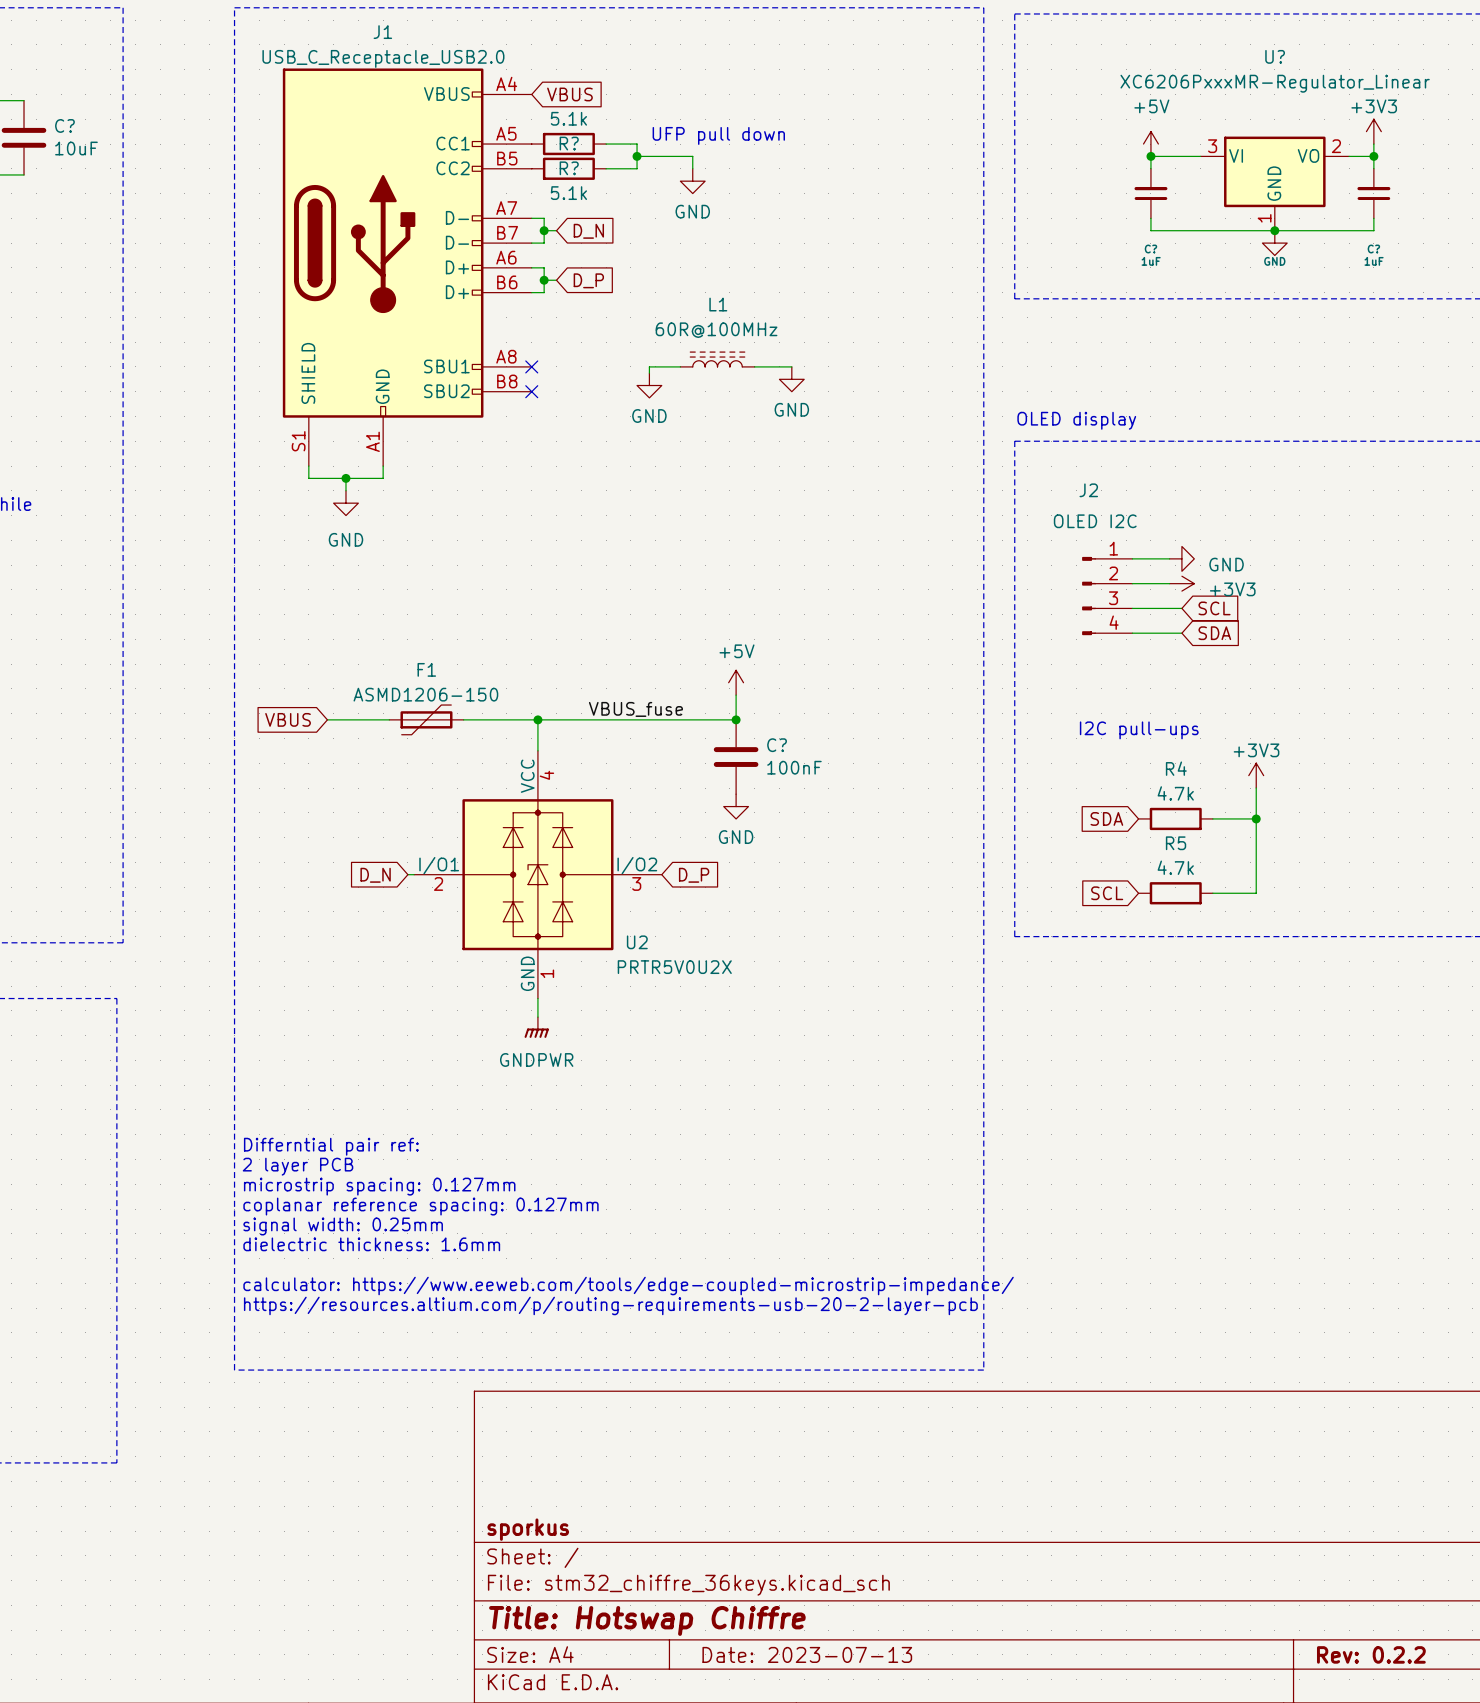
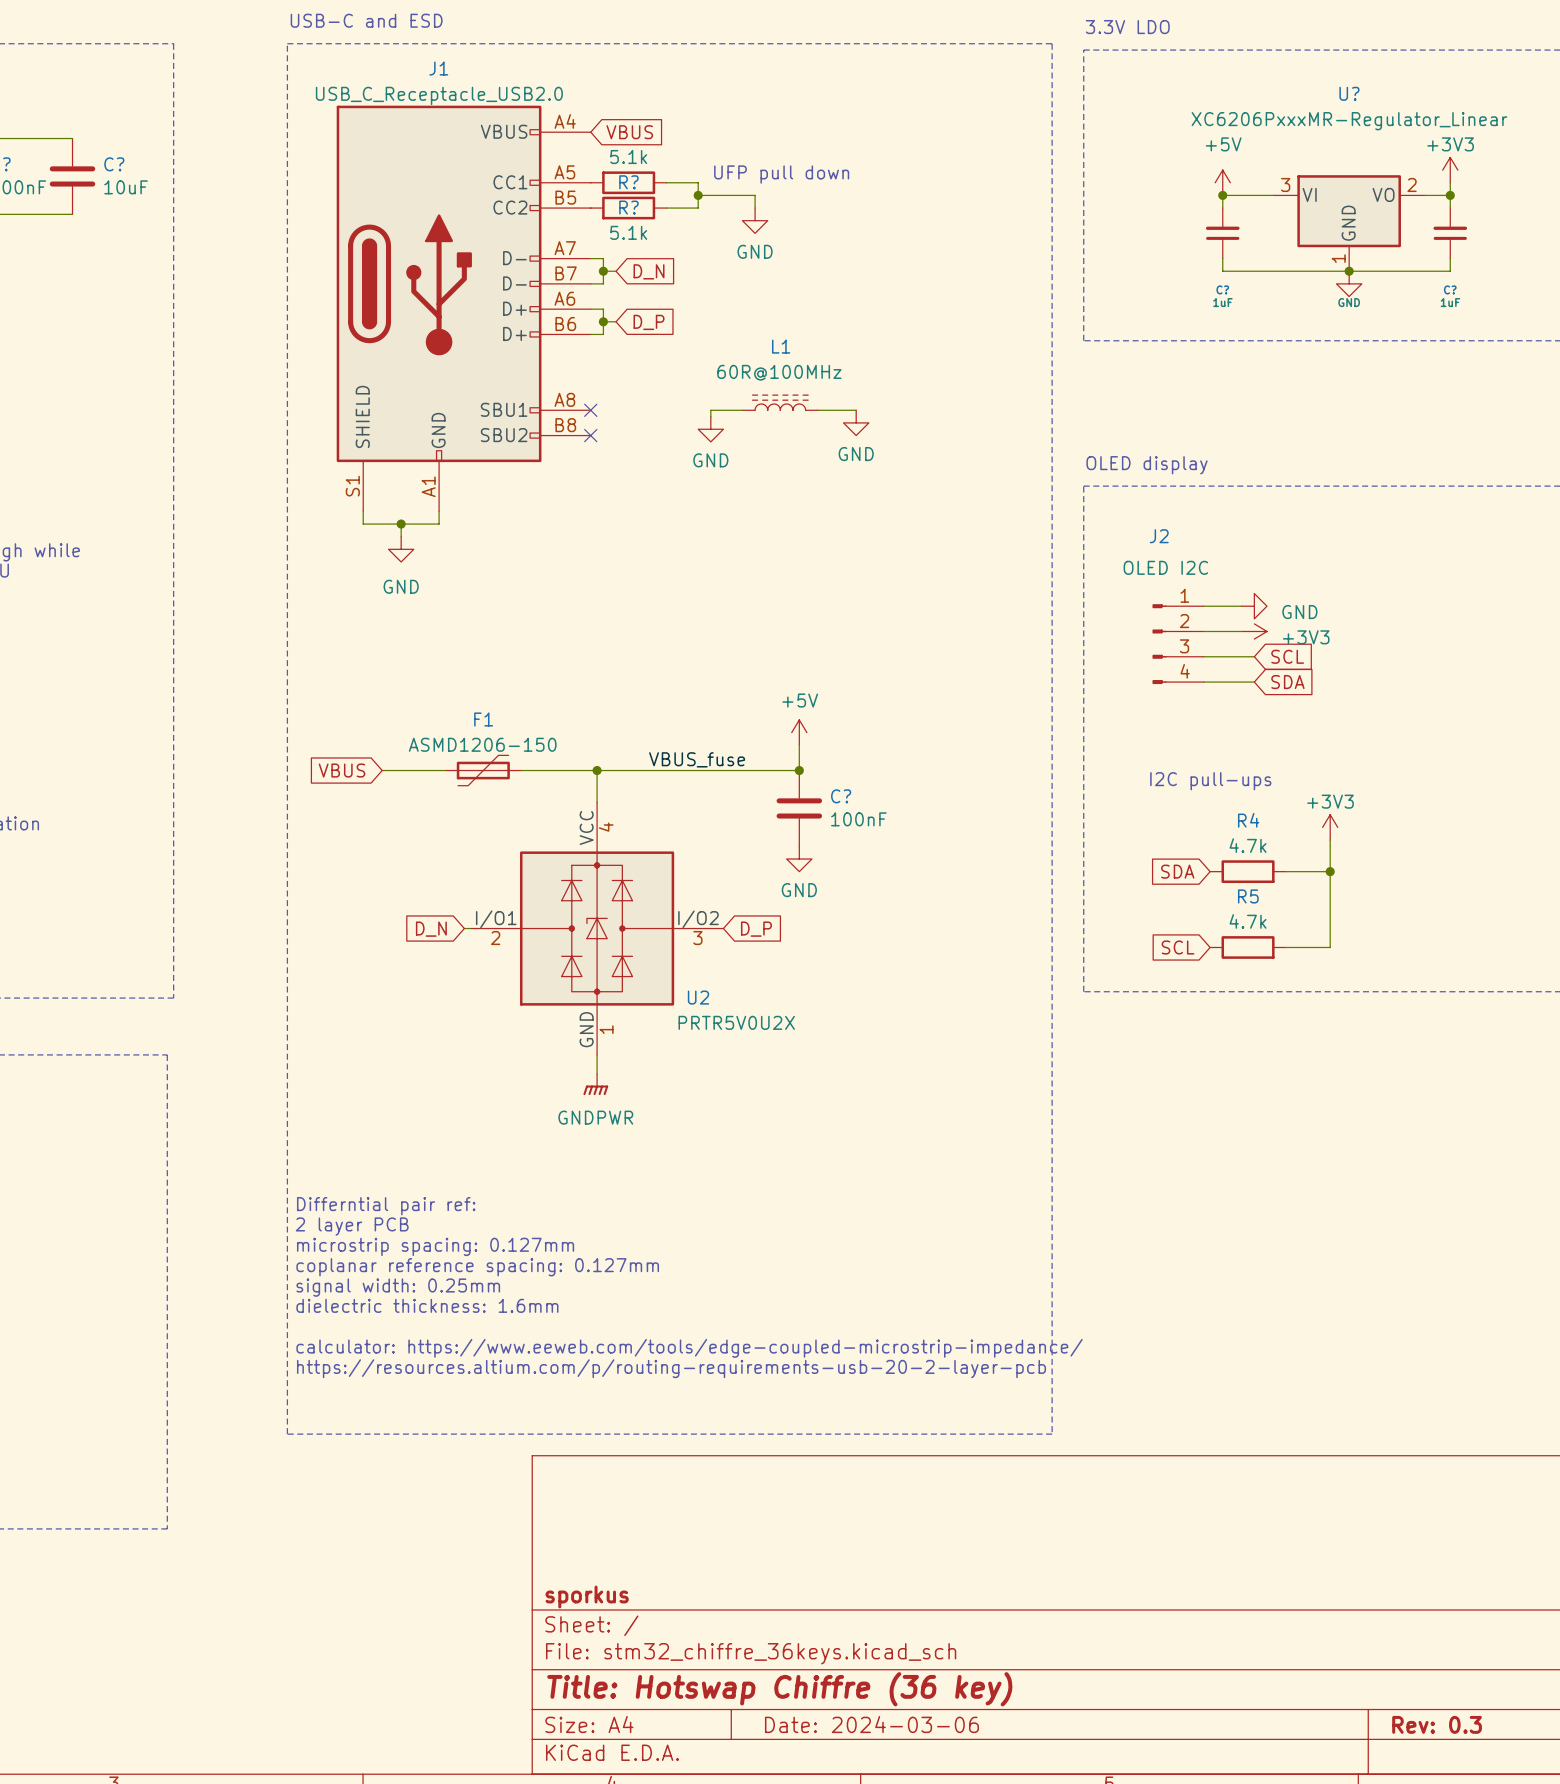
title block: Title: Hotswap Chiffre (647, 1620) -> Title: Hotswap Chiffre (36 key) (779, 1689)
title block: Date: 2023-07-13 (807, 1654) -> Date: 2024-03-06 (871, 1724)
title block: Rev: 0.2.2 (1371, 1654) -> Rev: 0.3 (1437, 1724)

